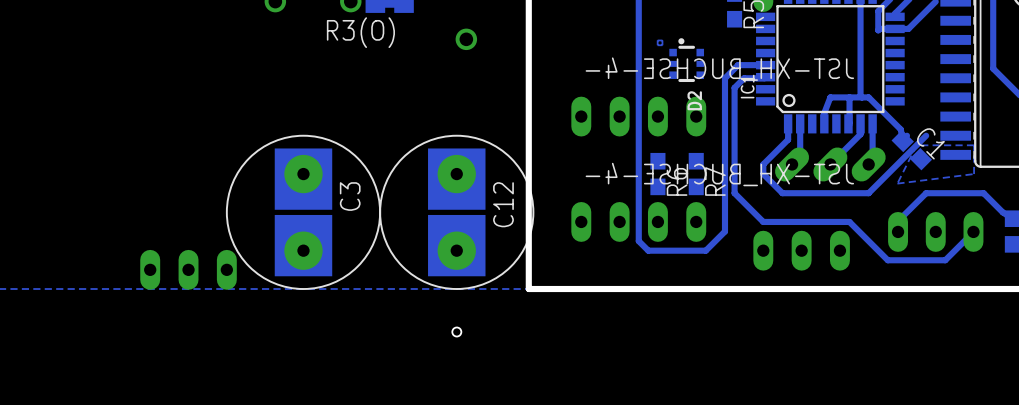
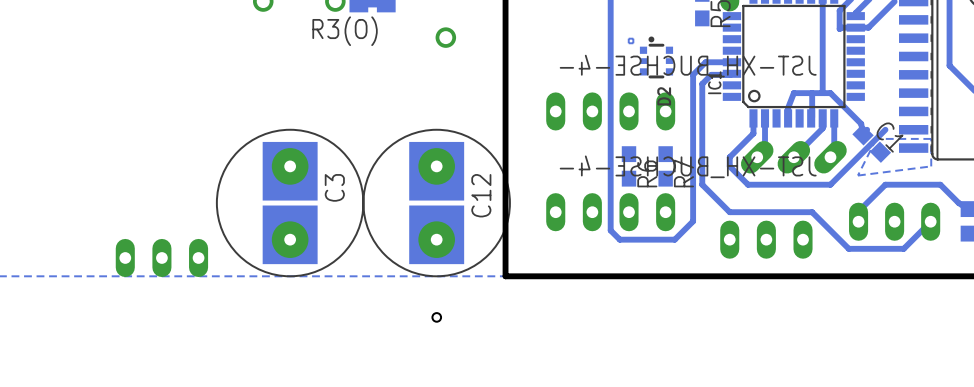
part: none -> (125, 257)
part: (150, 269) -> none
part: none -> (161, 257)
part: (188, 269) -> none
part: none -> (198, 257)
part: (226, 269) -> none

